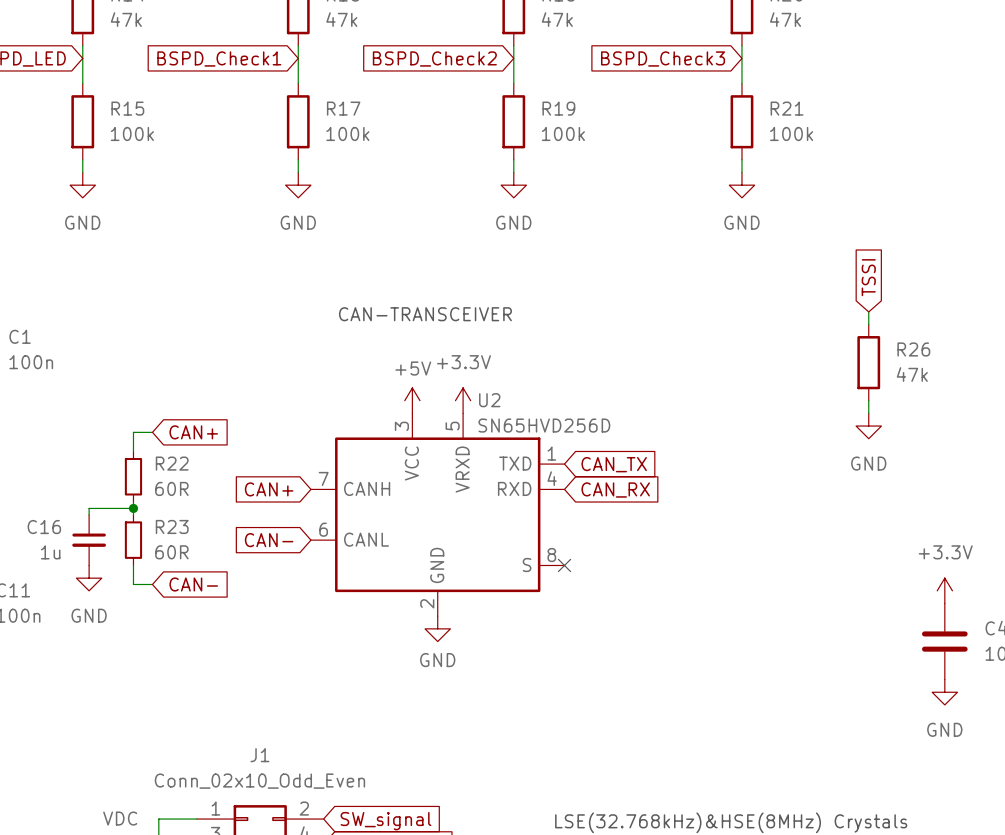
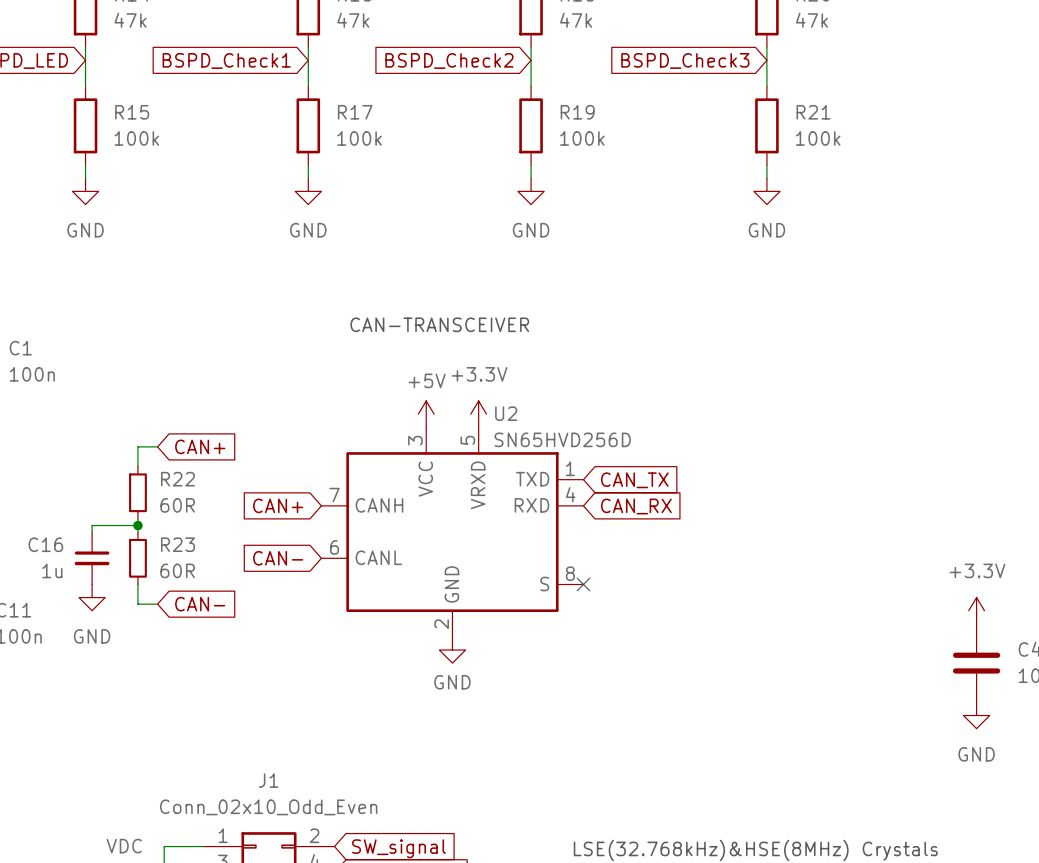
global label: TSSI (868, 277) -> none
wire: (868, 311) (868, 324) -> none
R26: 47k (868, 362) -> none
wire: (868, 400) (868, 413) -> none
power symbol: GND (868, 426) -> none

